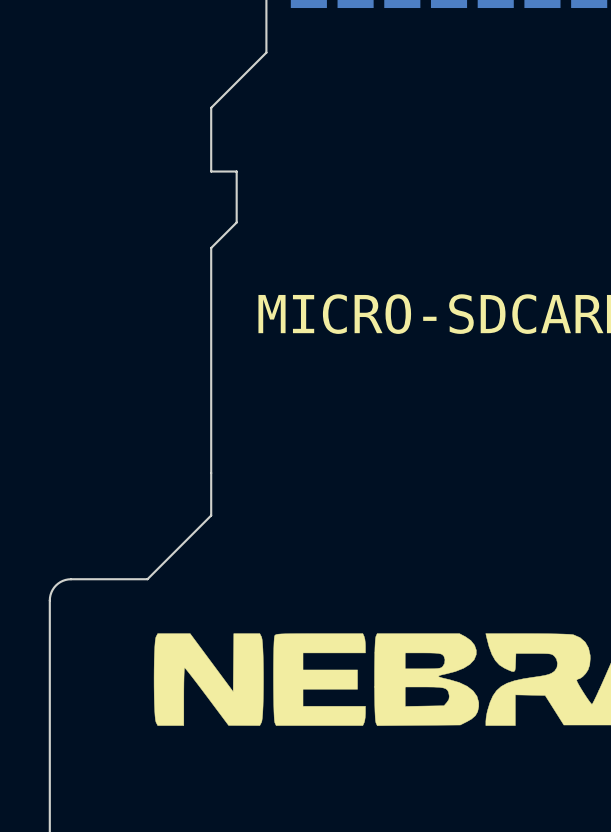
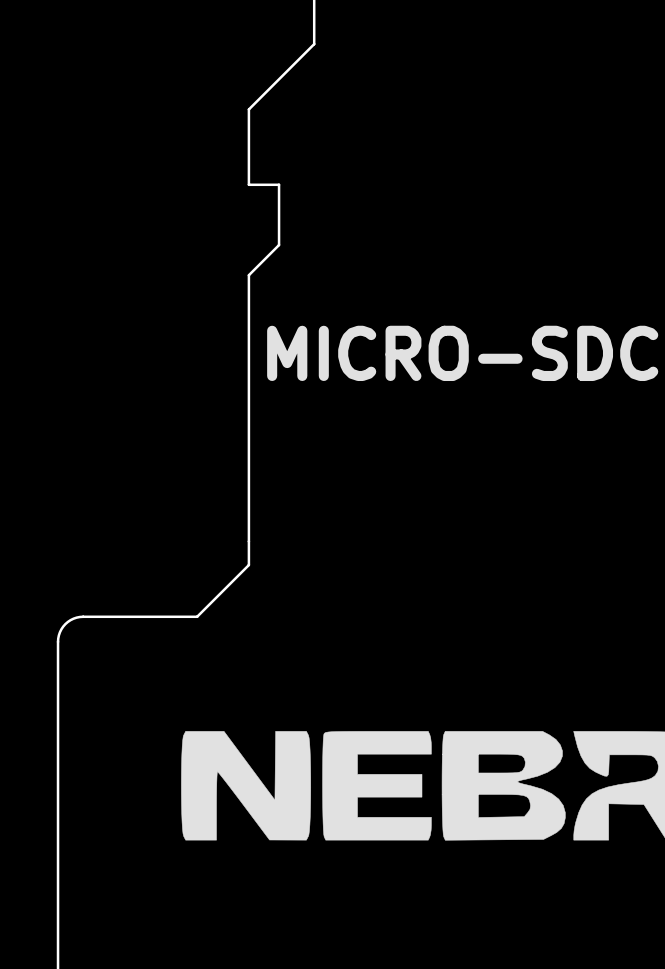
board edge: (211, 493) (211, 515) (147, 579) (65, 579) (54, 587) (49, 600) -> (248, 565) (197, 616) (83, 616) (70, 620) (63, 626) (58, 638) (58, 692)

